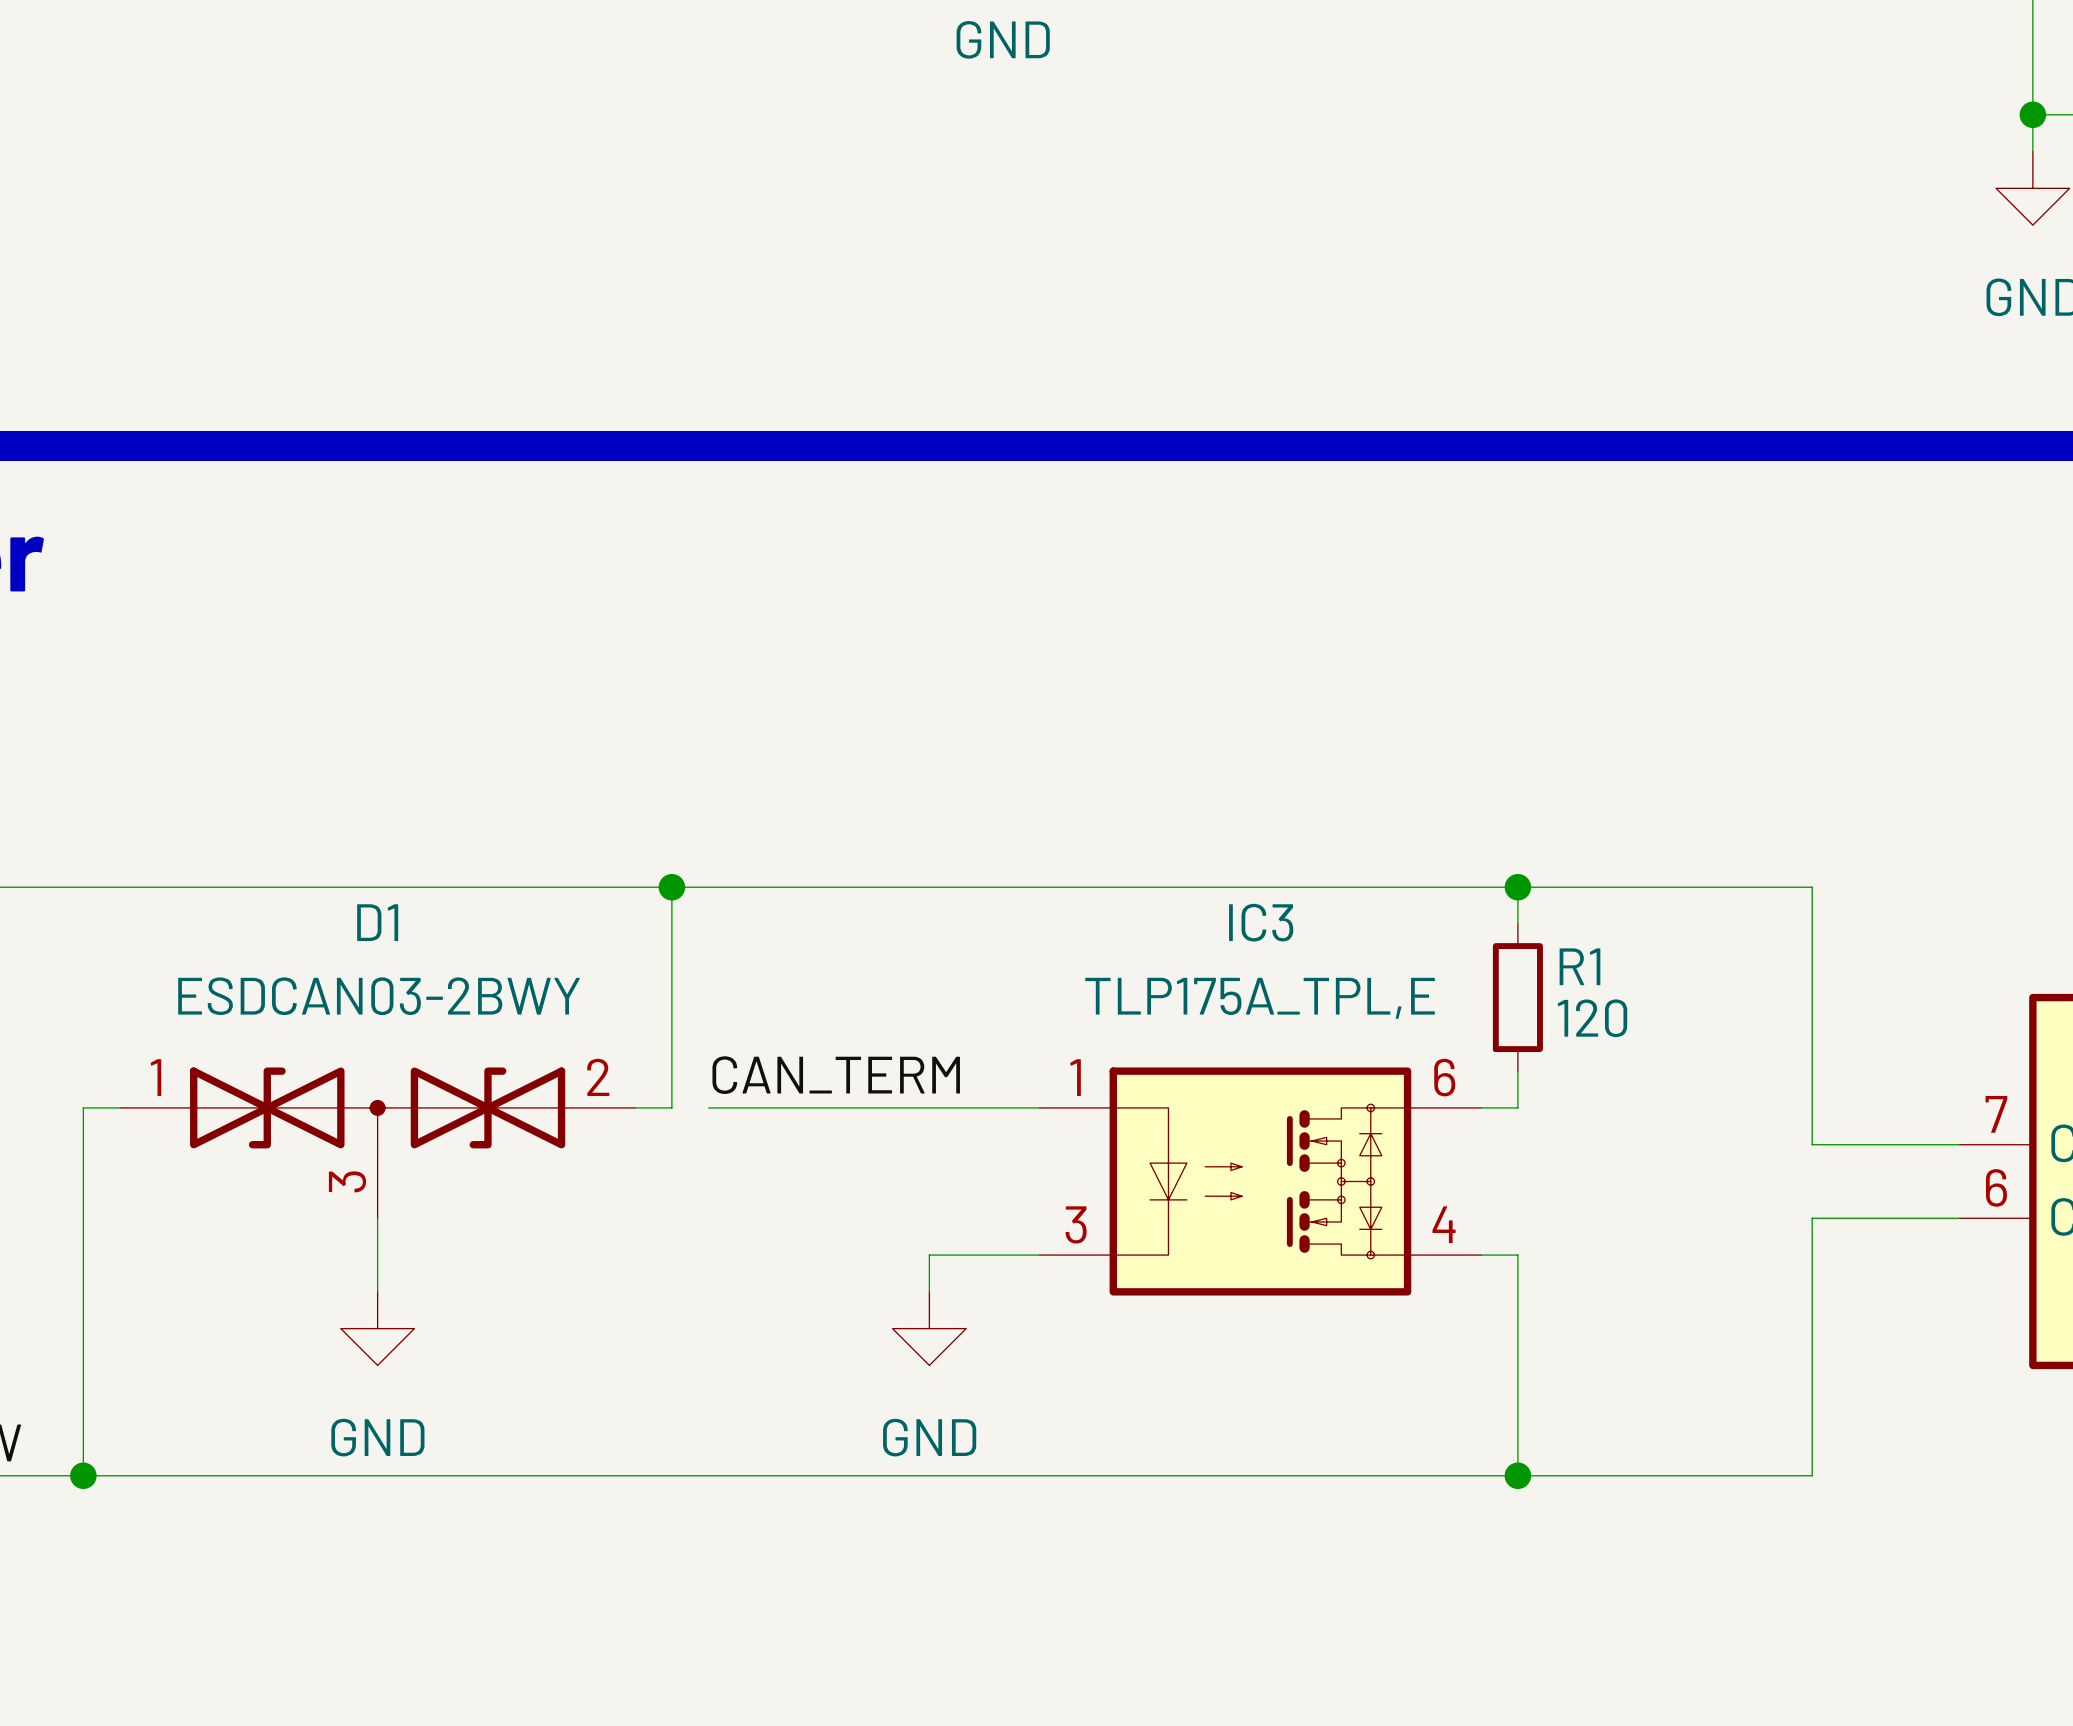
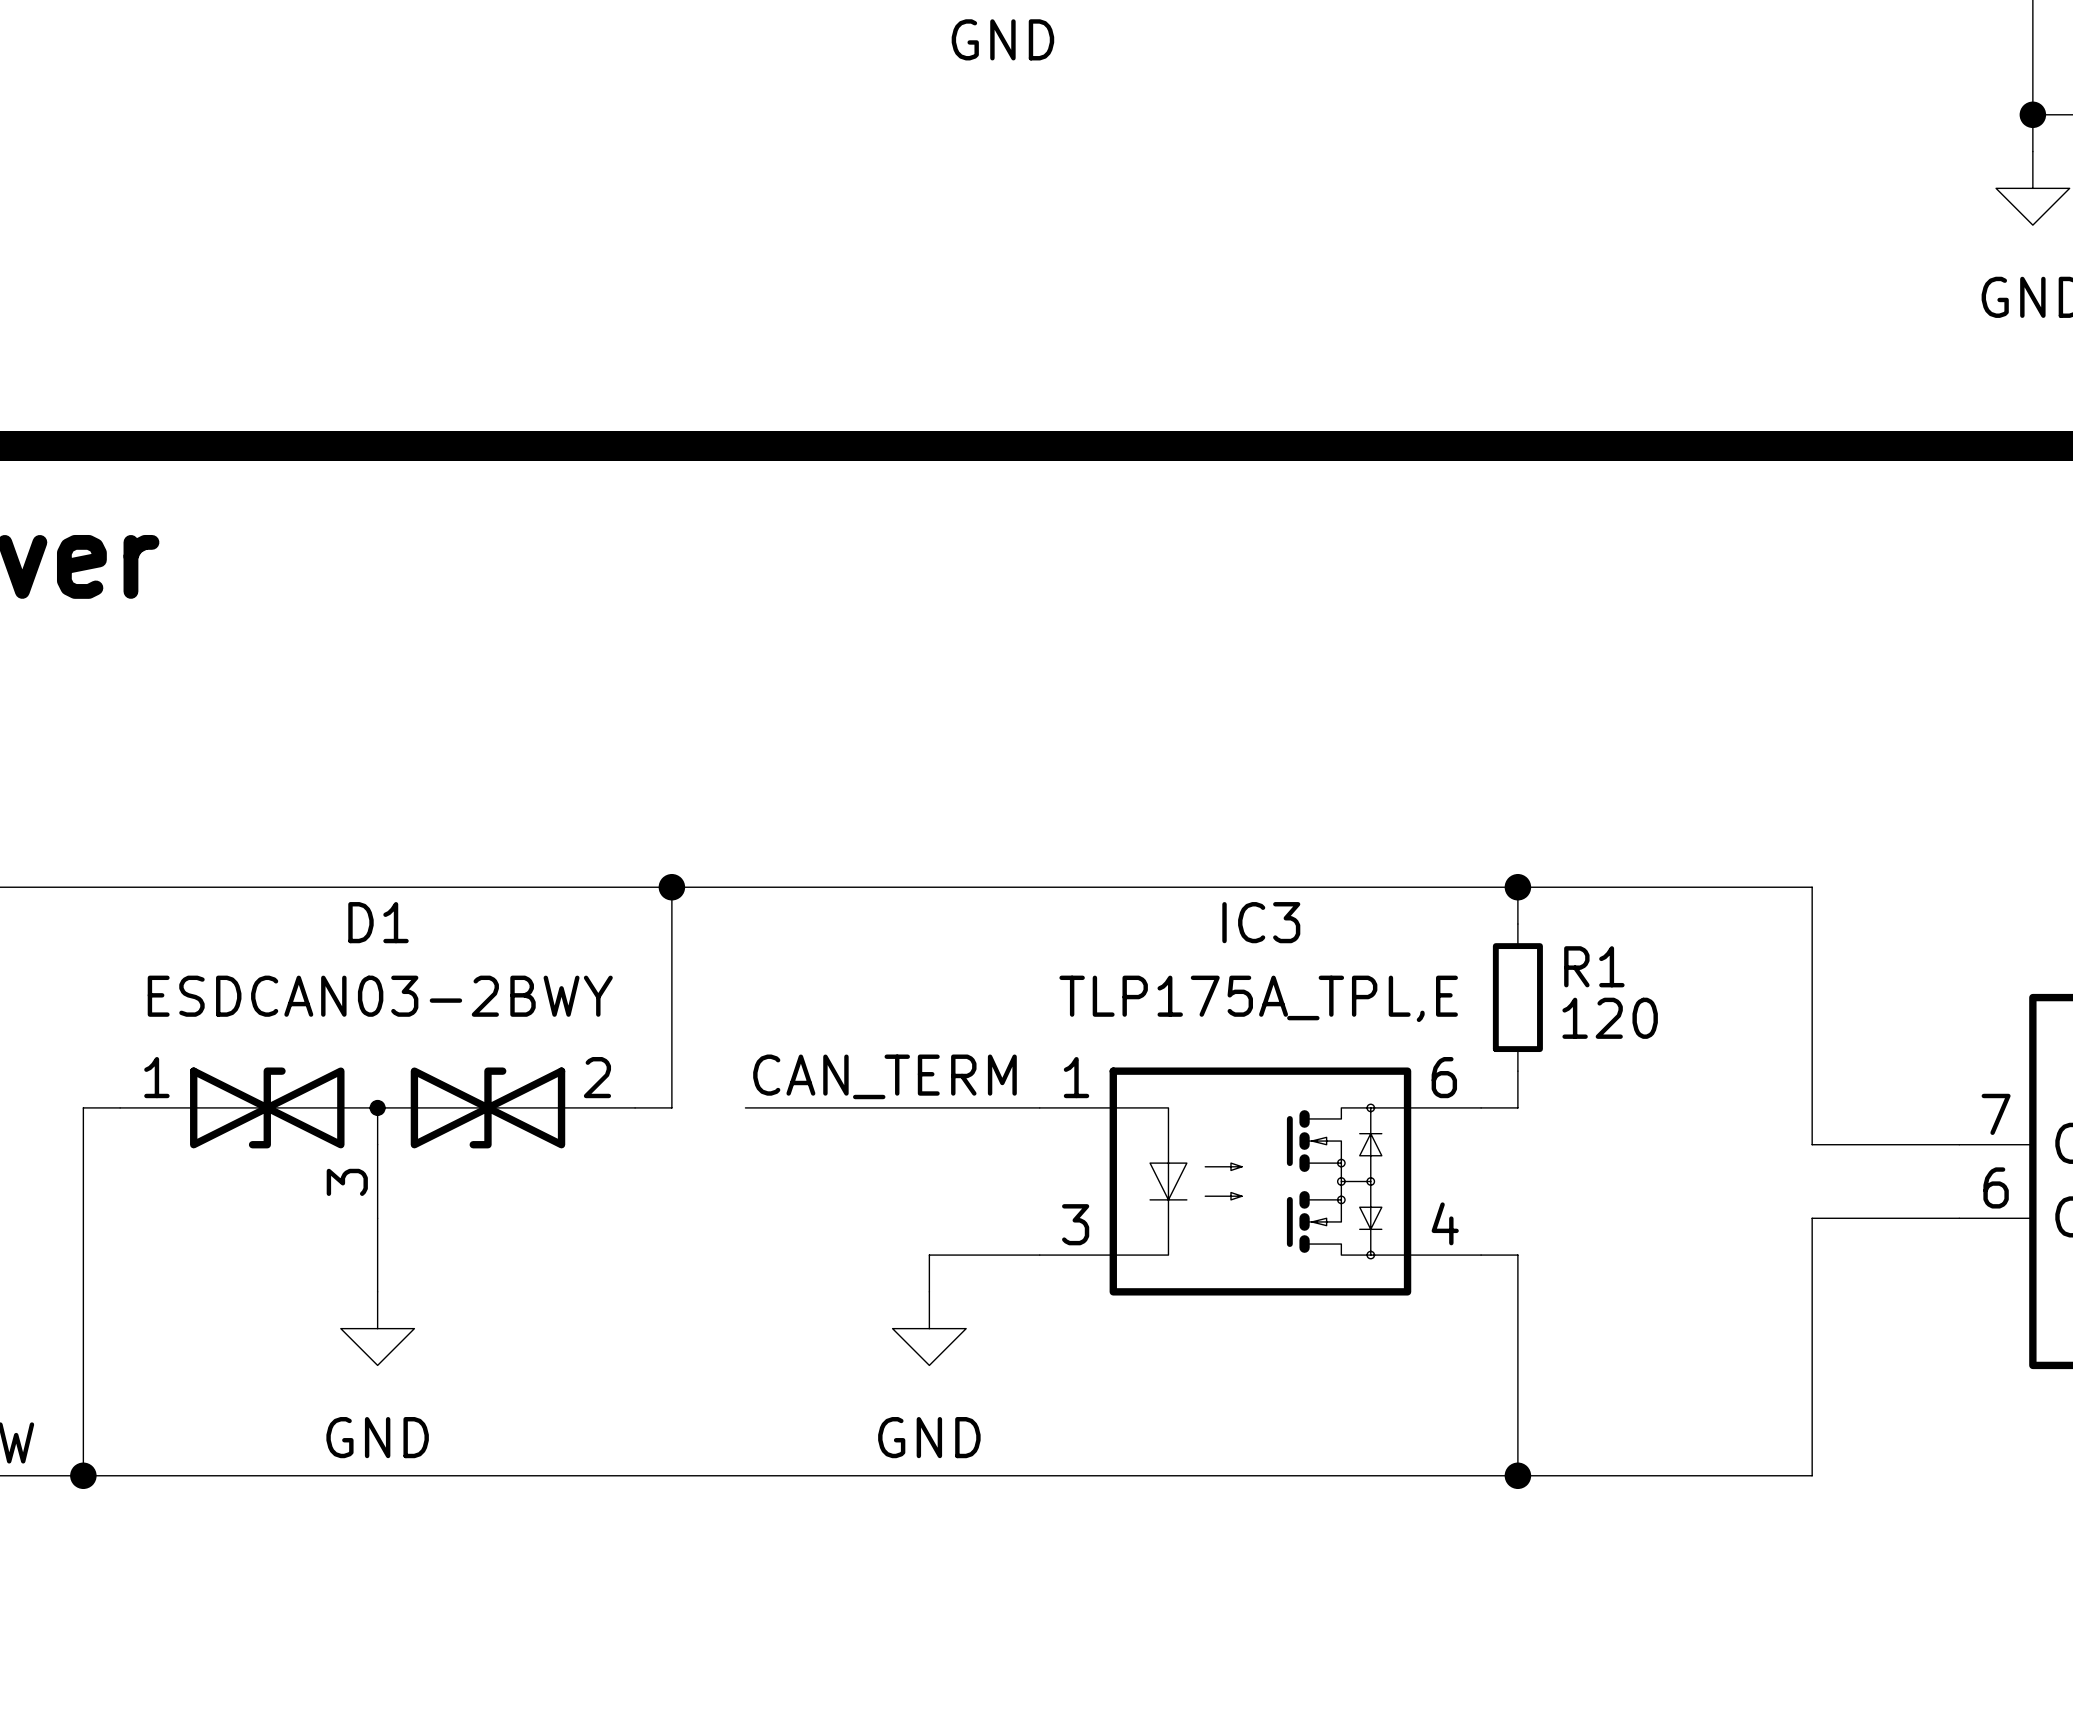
label position: CAN_TERM (836, 1075) -> CAN_TERM (884, 1076)
wire: (708, 1107) (745, 1107) -> none

